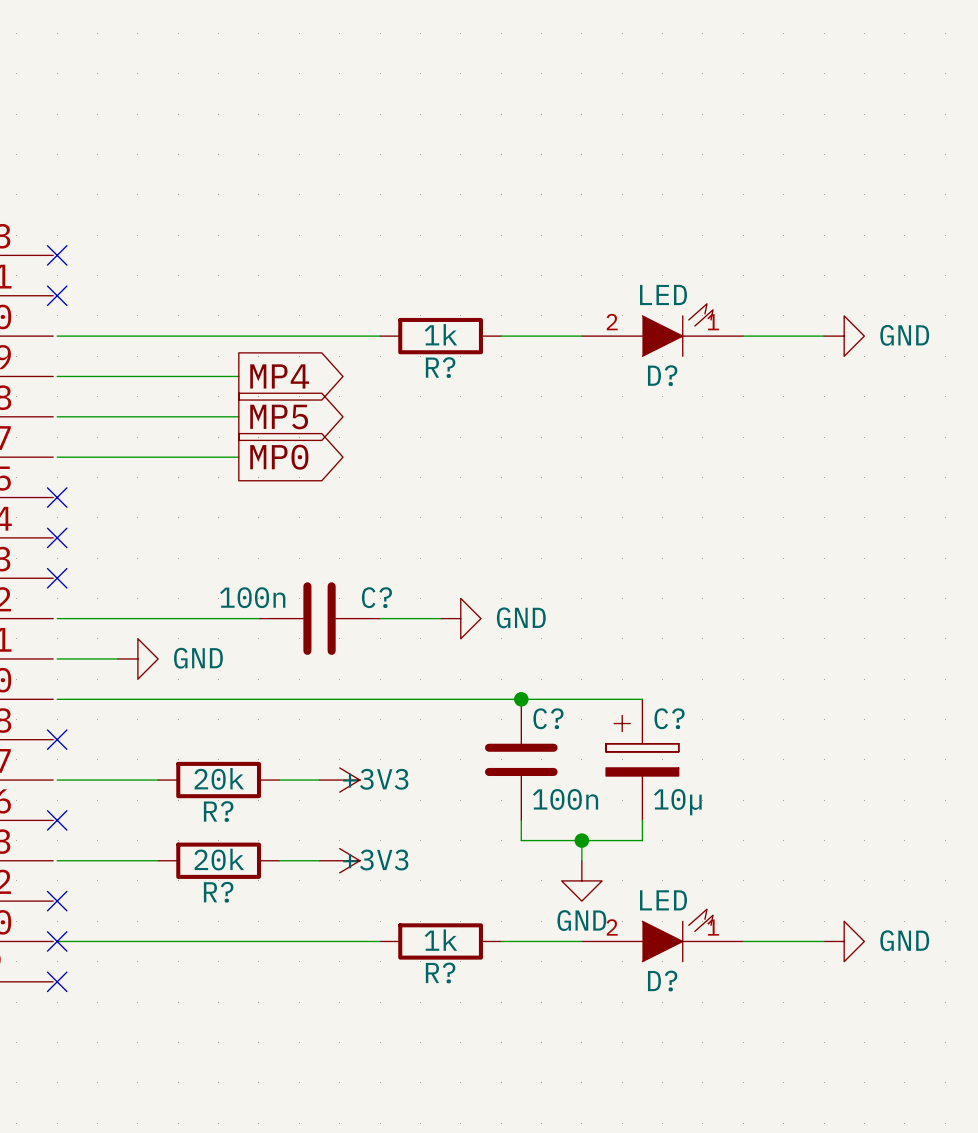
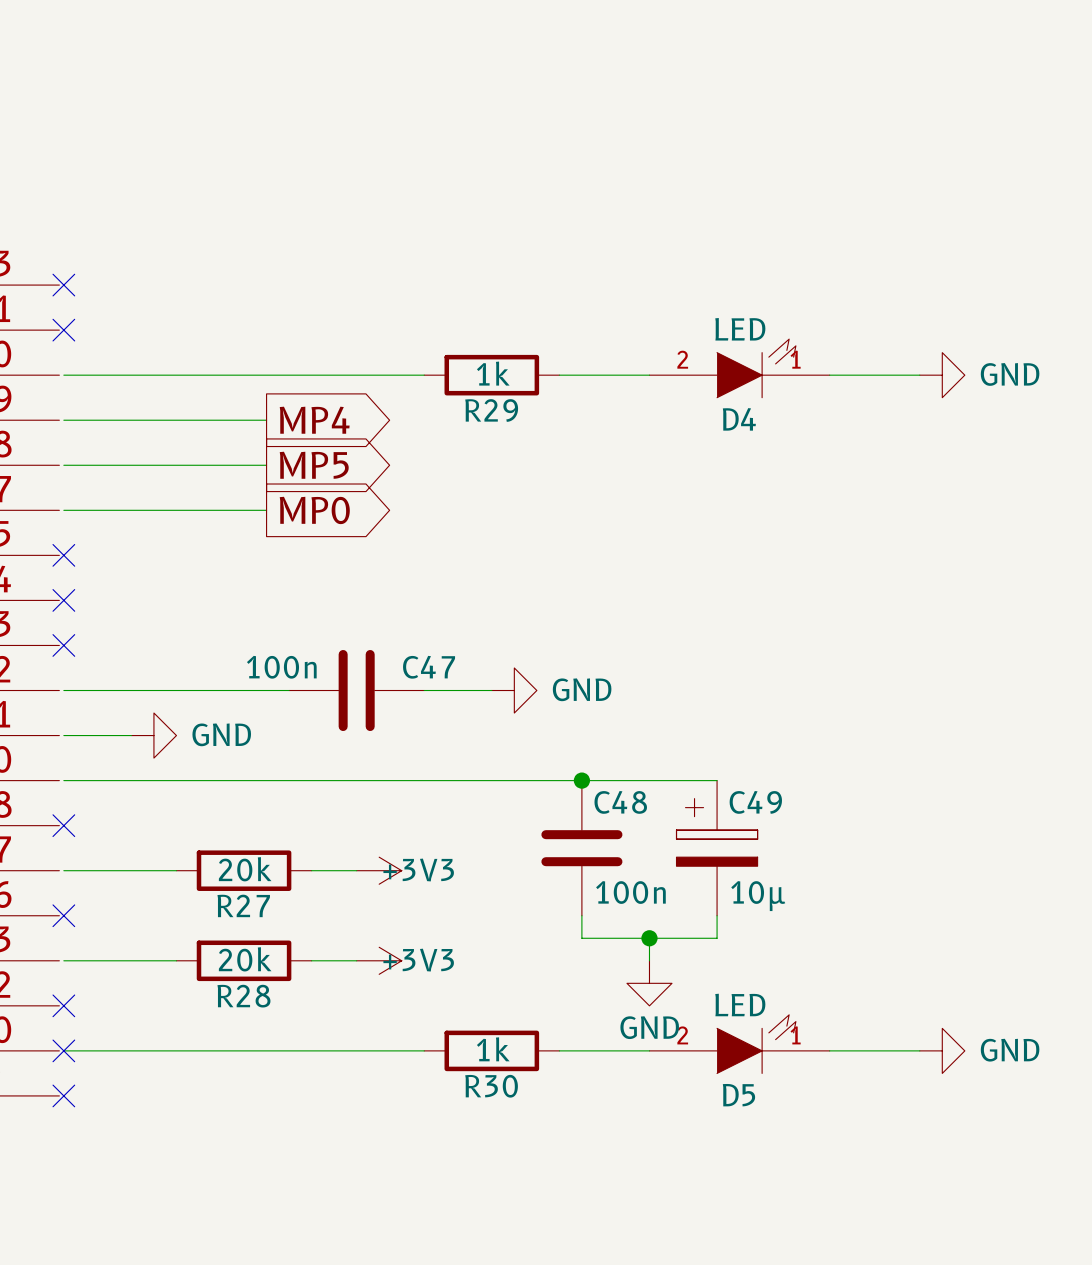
R? name: R? (440, 367) -> R29 (491, 410)
D? name: D? (662, 375) -> D4 (739, 419)
C? name: C? (376, 597) -> C47 (429, 667)
C? name: C? (548, 718) -> C48 (620, 802)
C? name: C? (669, 718) -> C49 (755, 802)
R? name: R? (218, 811) -> R27 (243, 905)
R? name: R? (218, 892) -> R28 (243, 996)
R? name: R? (440, 972) -> R30 (491, 1086)
D? name: D? (662, 981) -> D5 (738, 1095)

